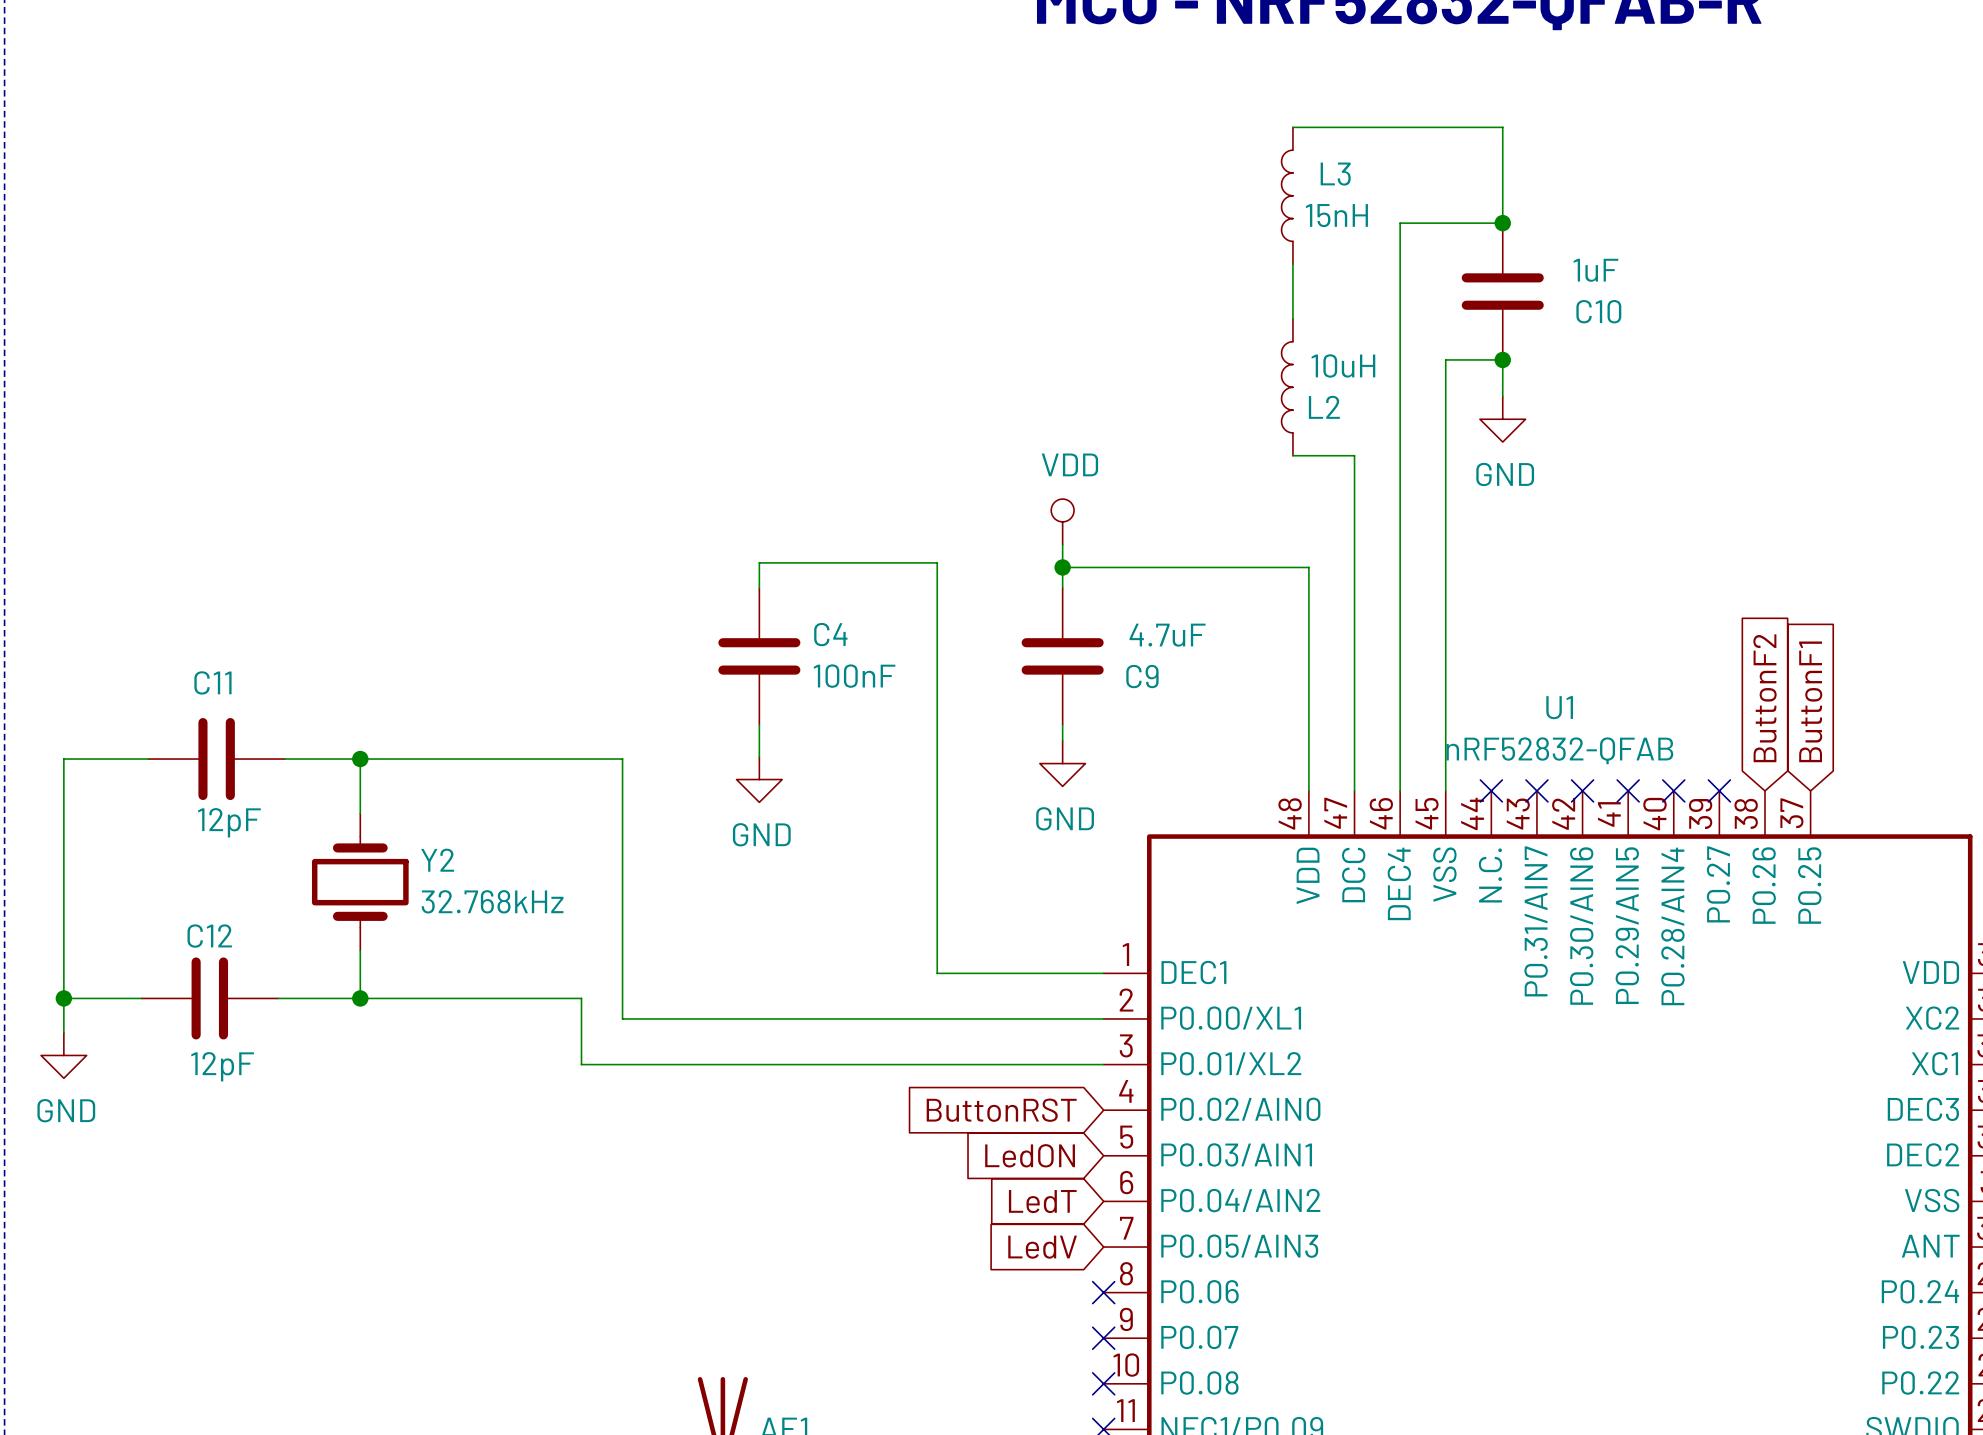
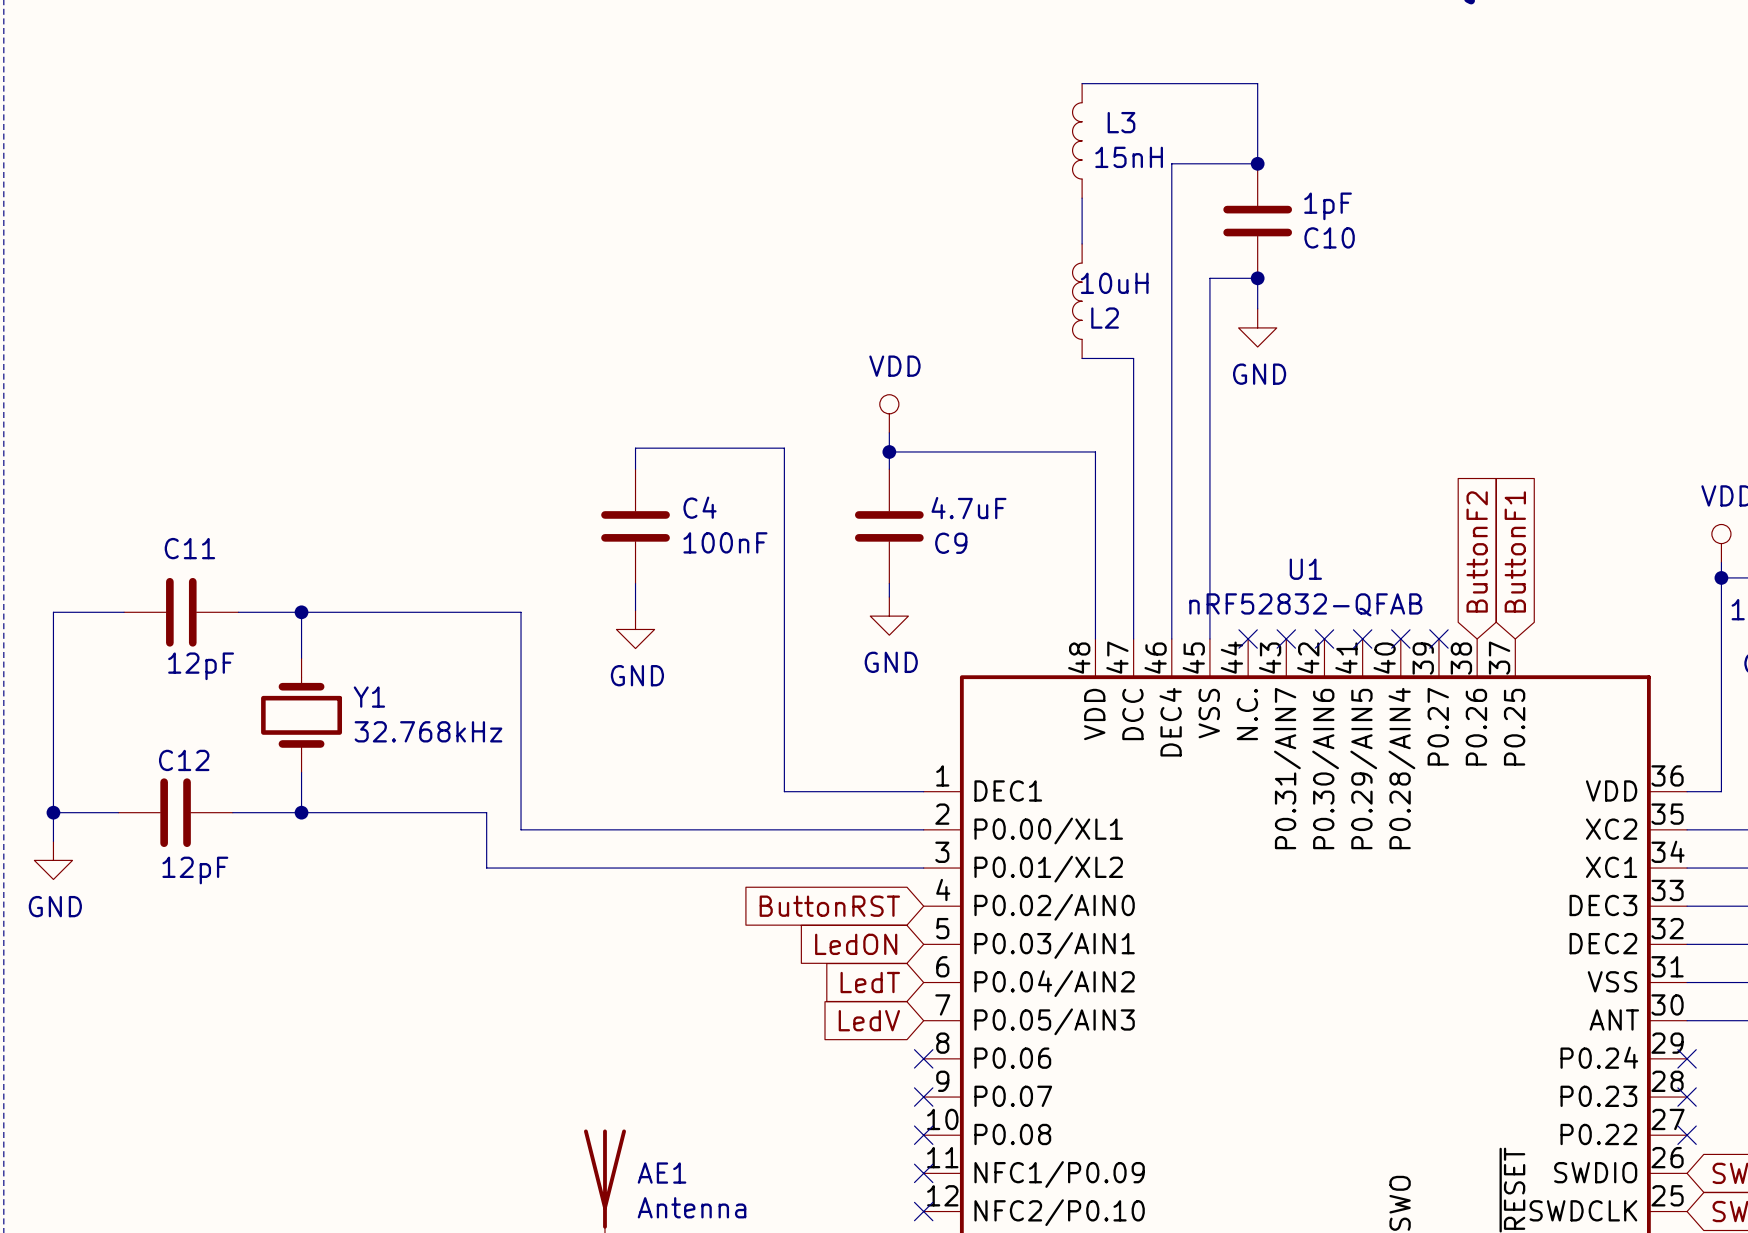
C10 value: 1uF (1595, 270) -> 1pF (1328, 206)
Y2 name: Y2 (437, 860) -> Y1 (369, 697)

